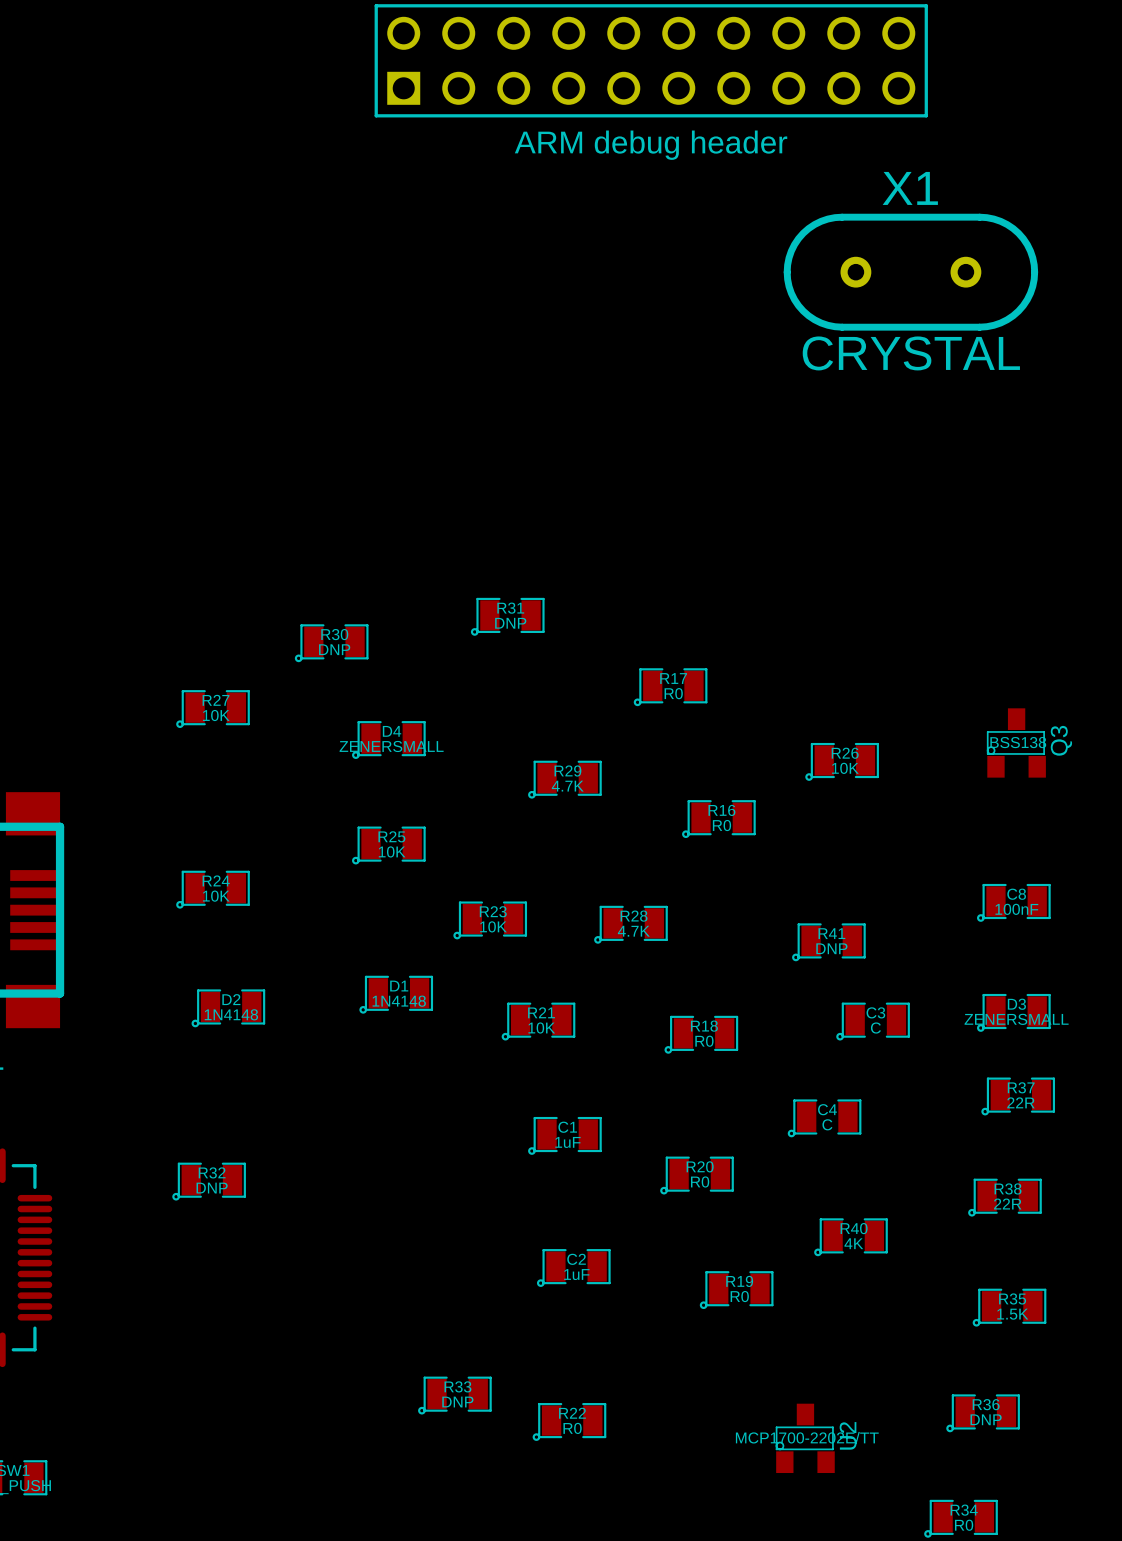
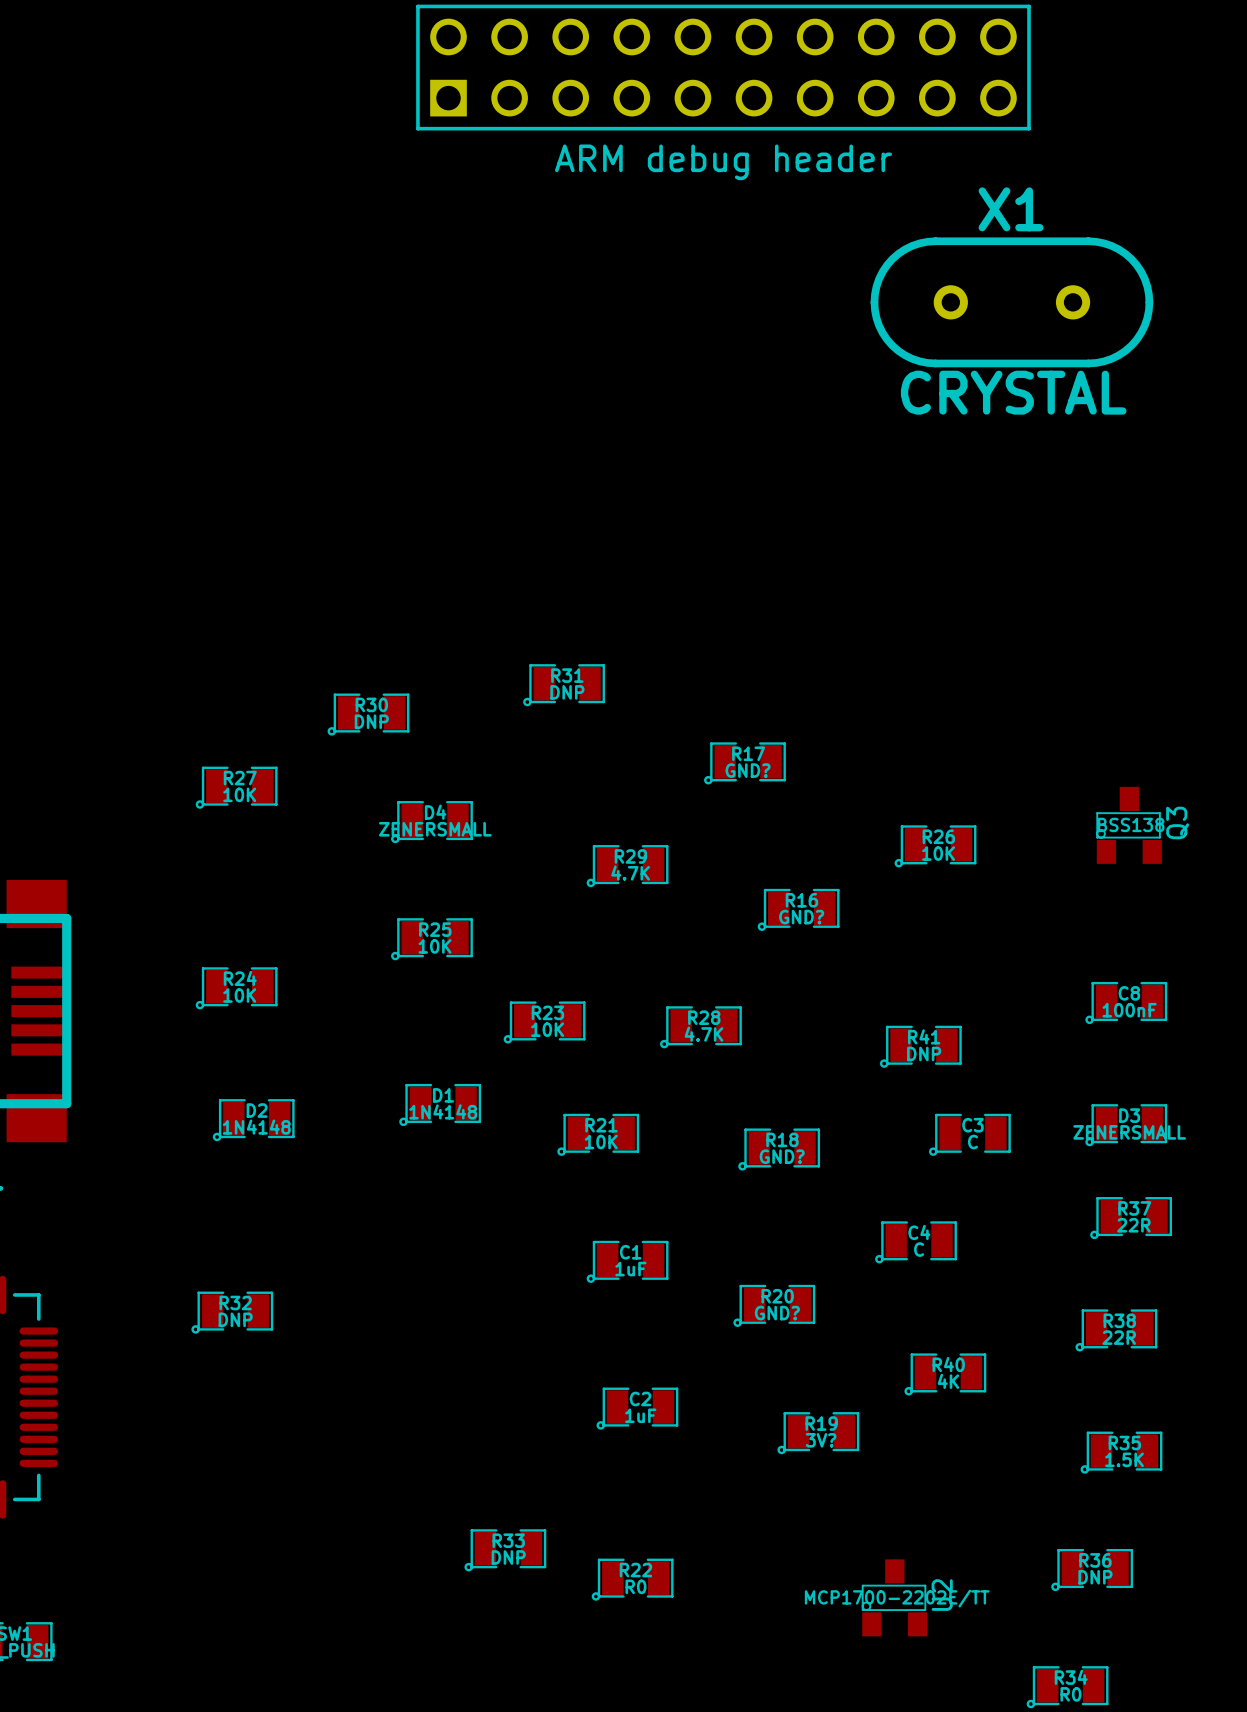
R17 value: R0 (673, 693) -> GND? (748, 770)
R16 value: R0 (721, 825) -> GND? (801, 917)
R18 value: R0 (704, 1041) -> GND? (782, 1156)
R20 value: R0 (700, 1181) -> GND? (777, 1313)
R19 value: R0 (739, 1296) -> 3V? (821, 1440)

